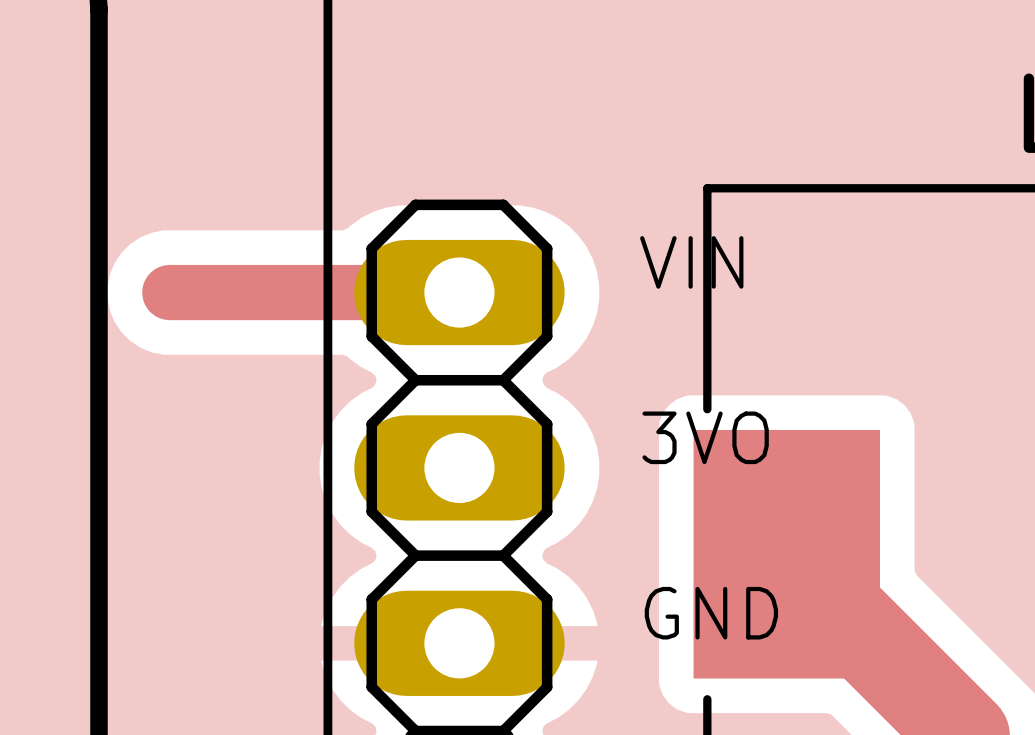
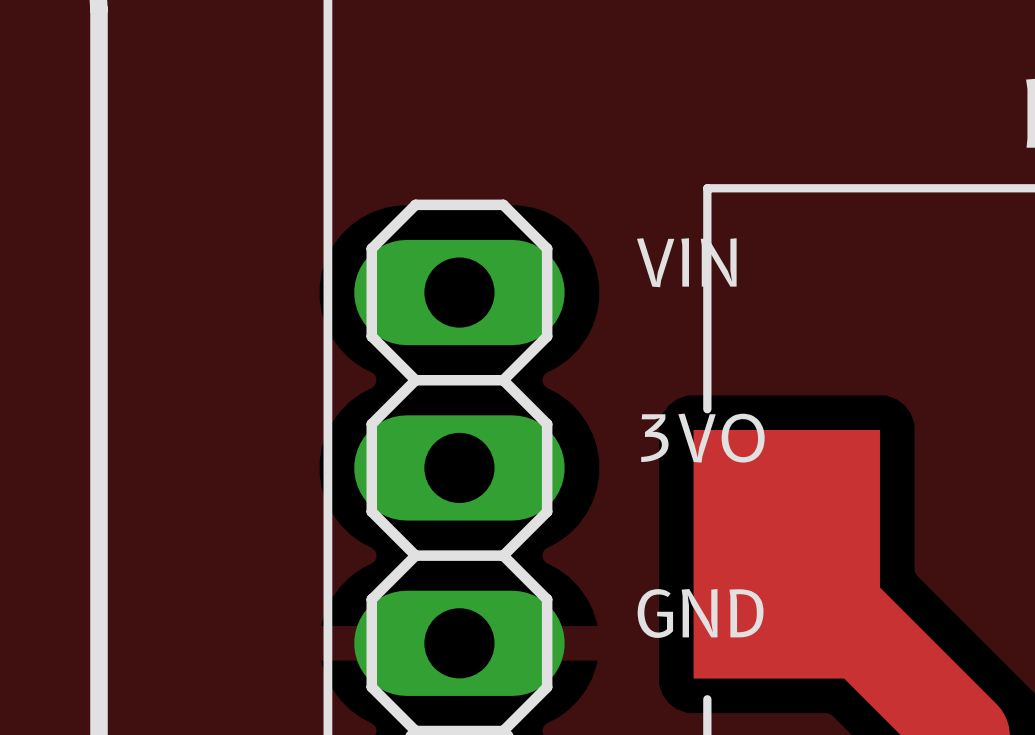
track: (169, 292) (459, 292) -> none

